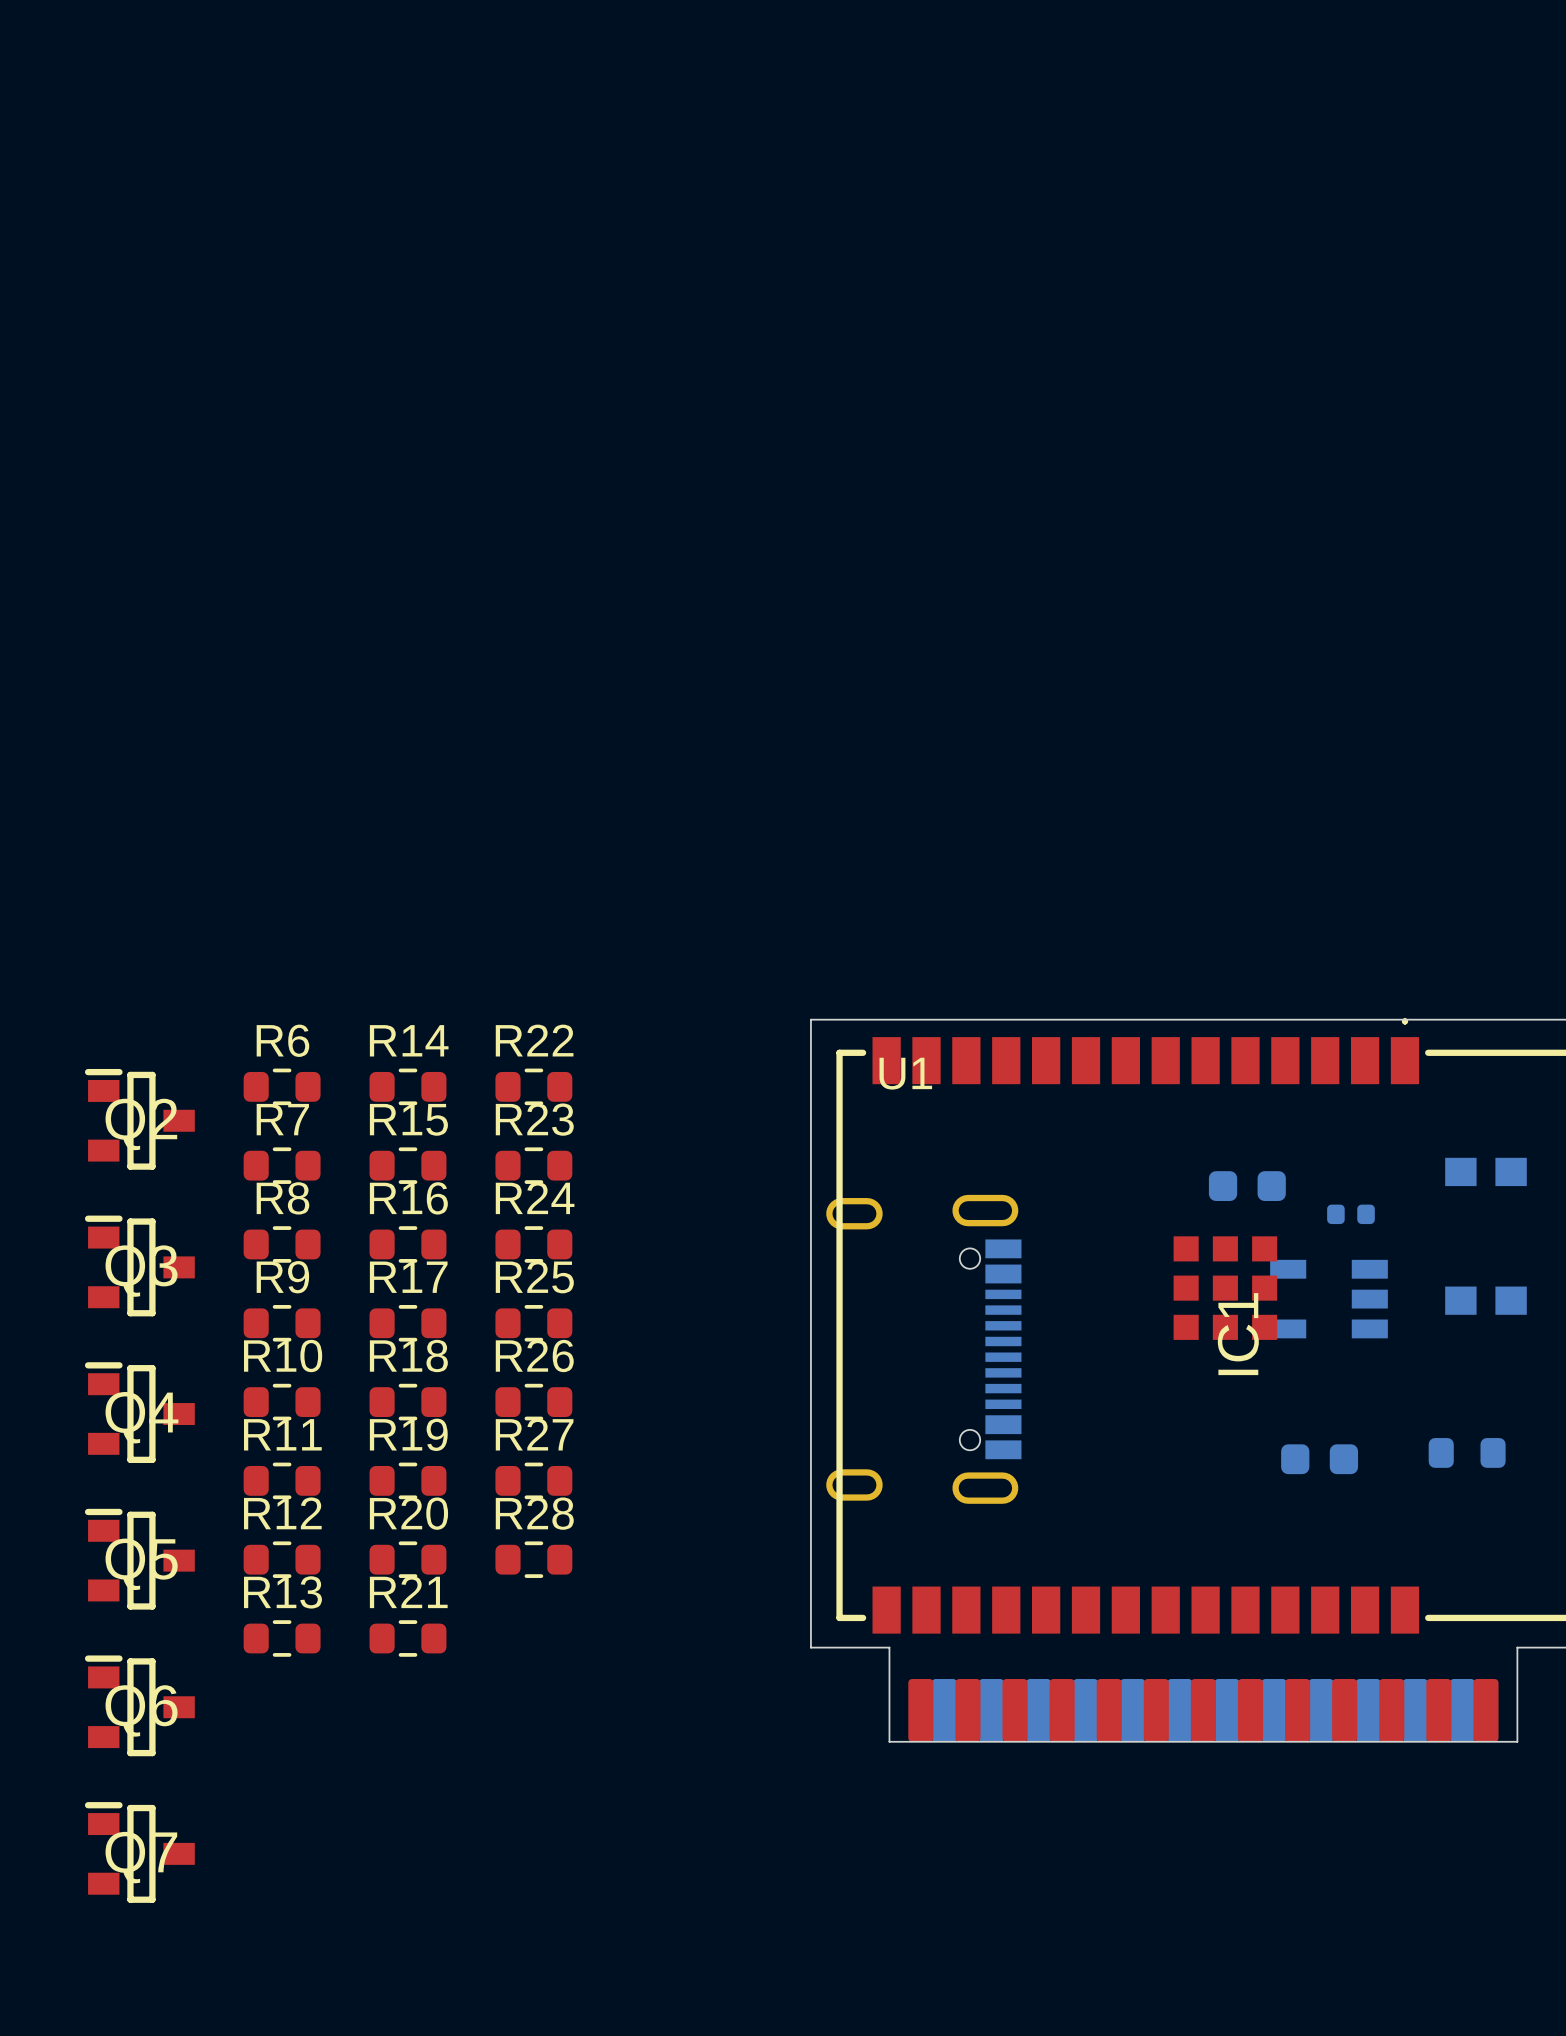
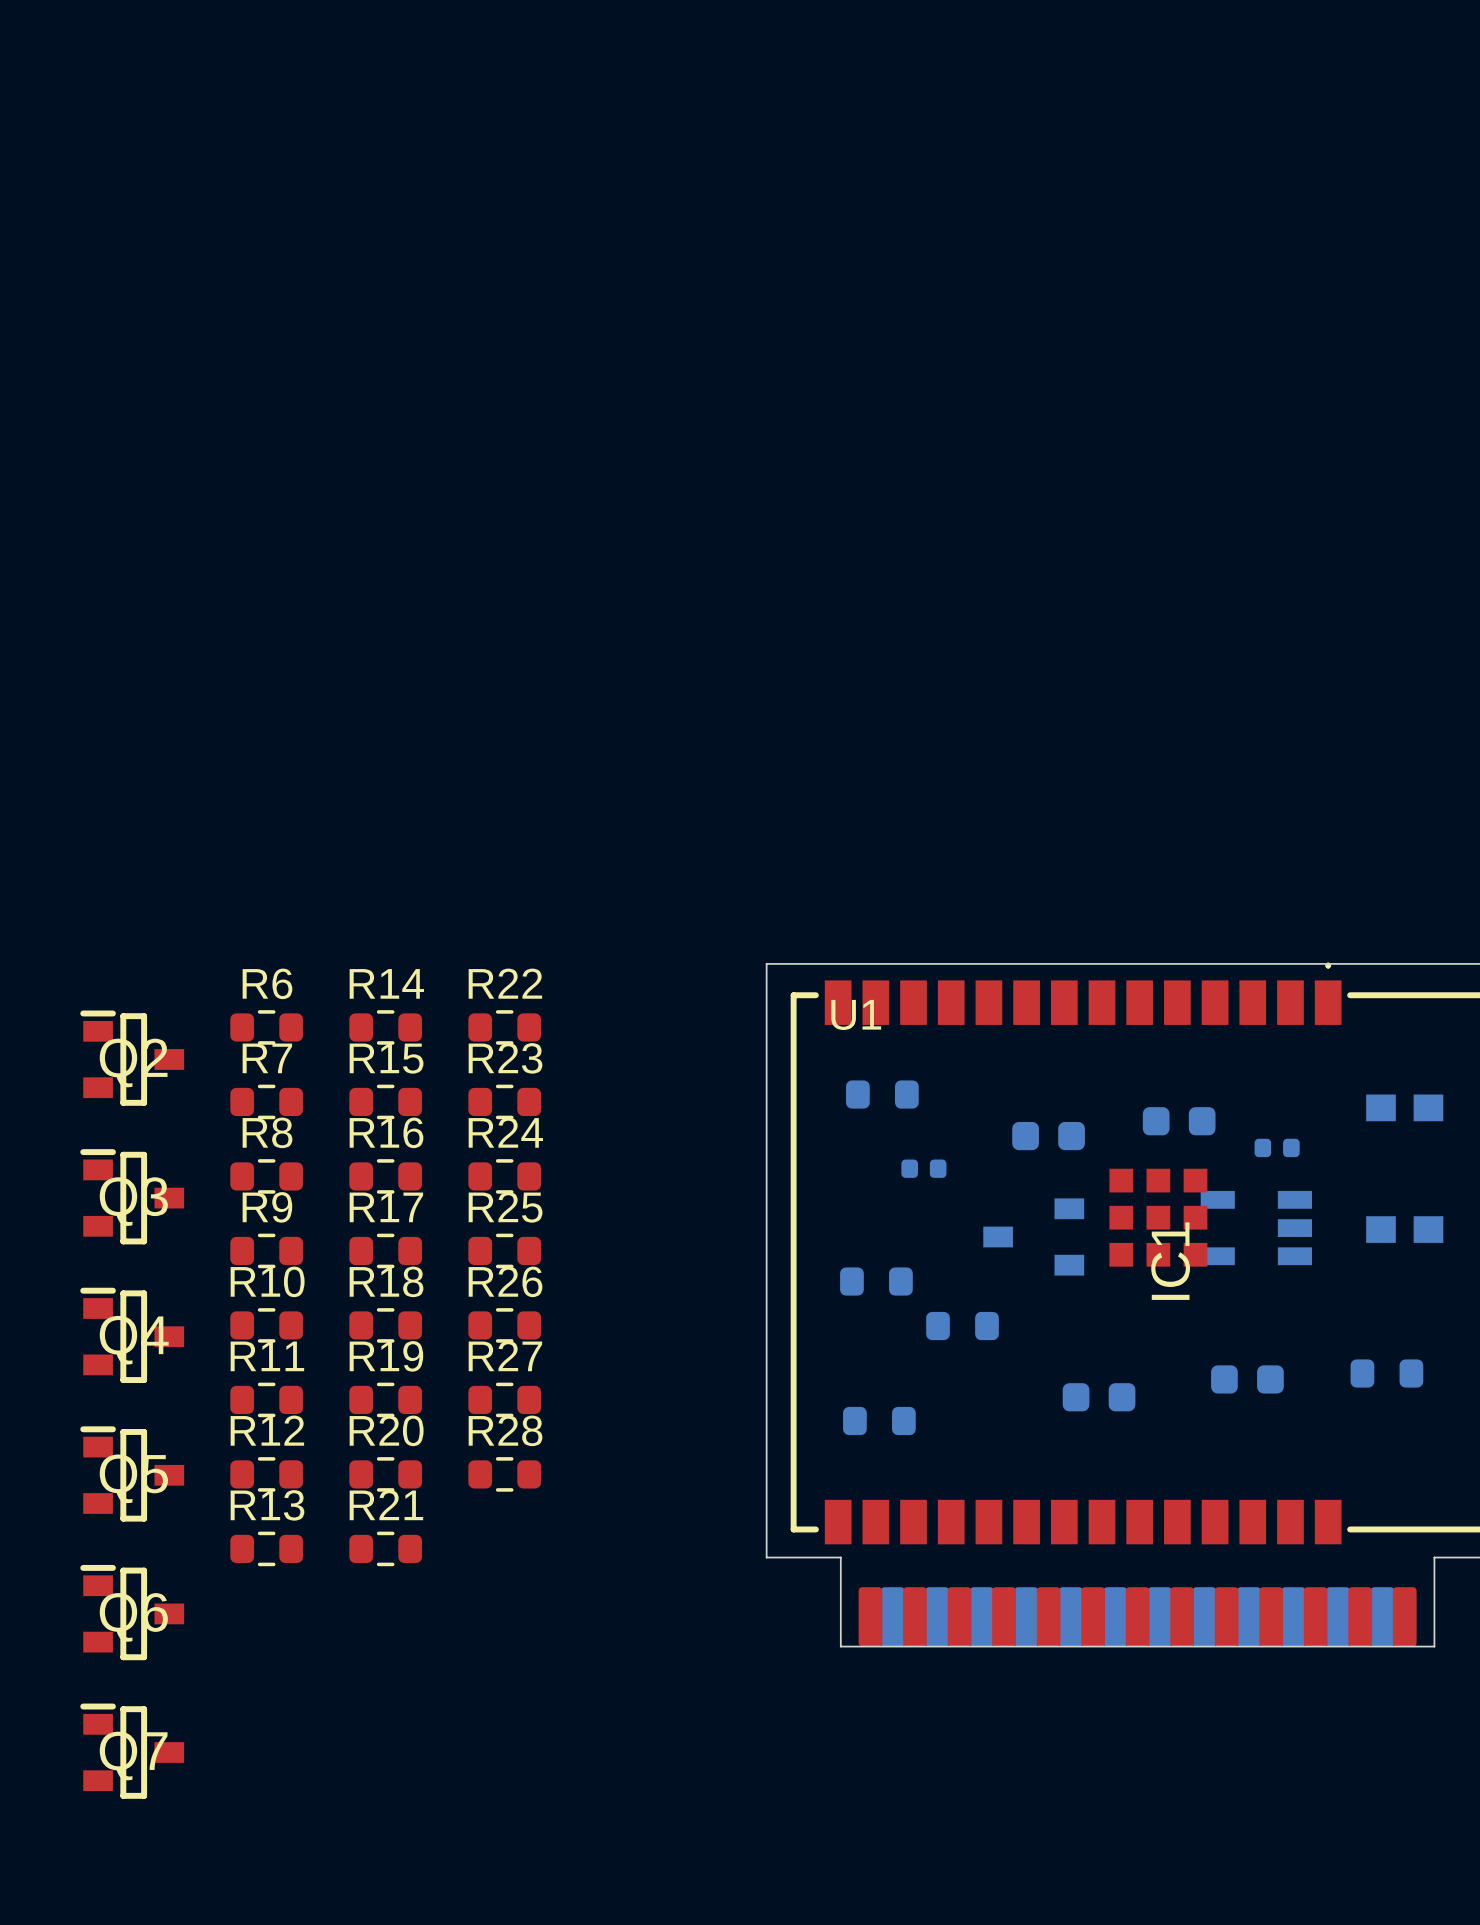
part: none -> (882, 1094)
part footprint: [826, 1194, 1022, 1504] -> [840, 1267, 913, 1296]
part: none -> (1048, 1136)
part: none -> (923, 1168)
part: none -> (1033, 1236)
part: none -> (962, 1326)
part: none -> (1099, 1397)
part: none -> (879, 1421)

